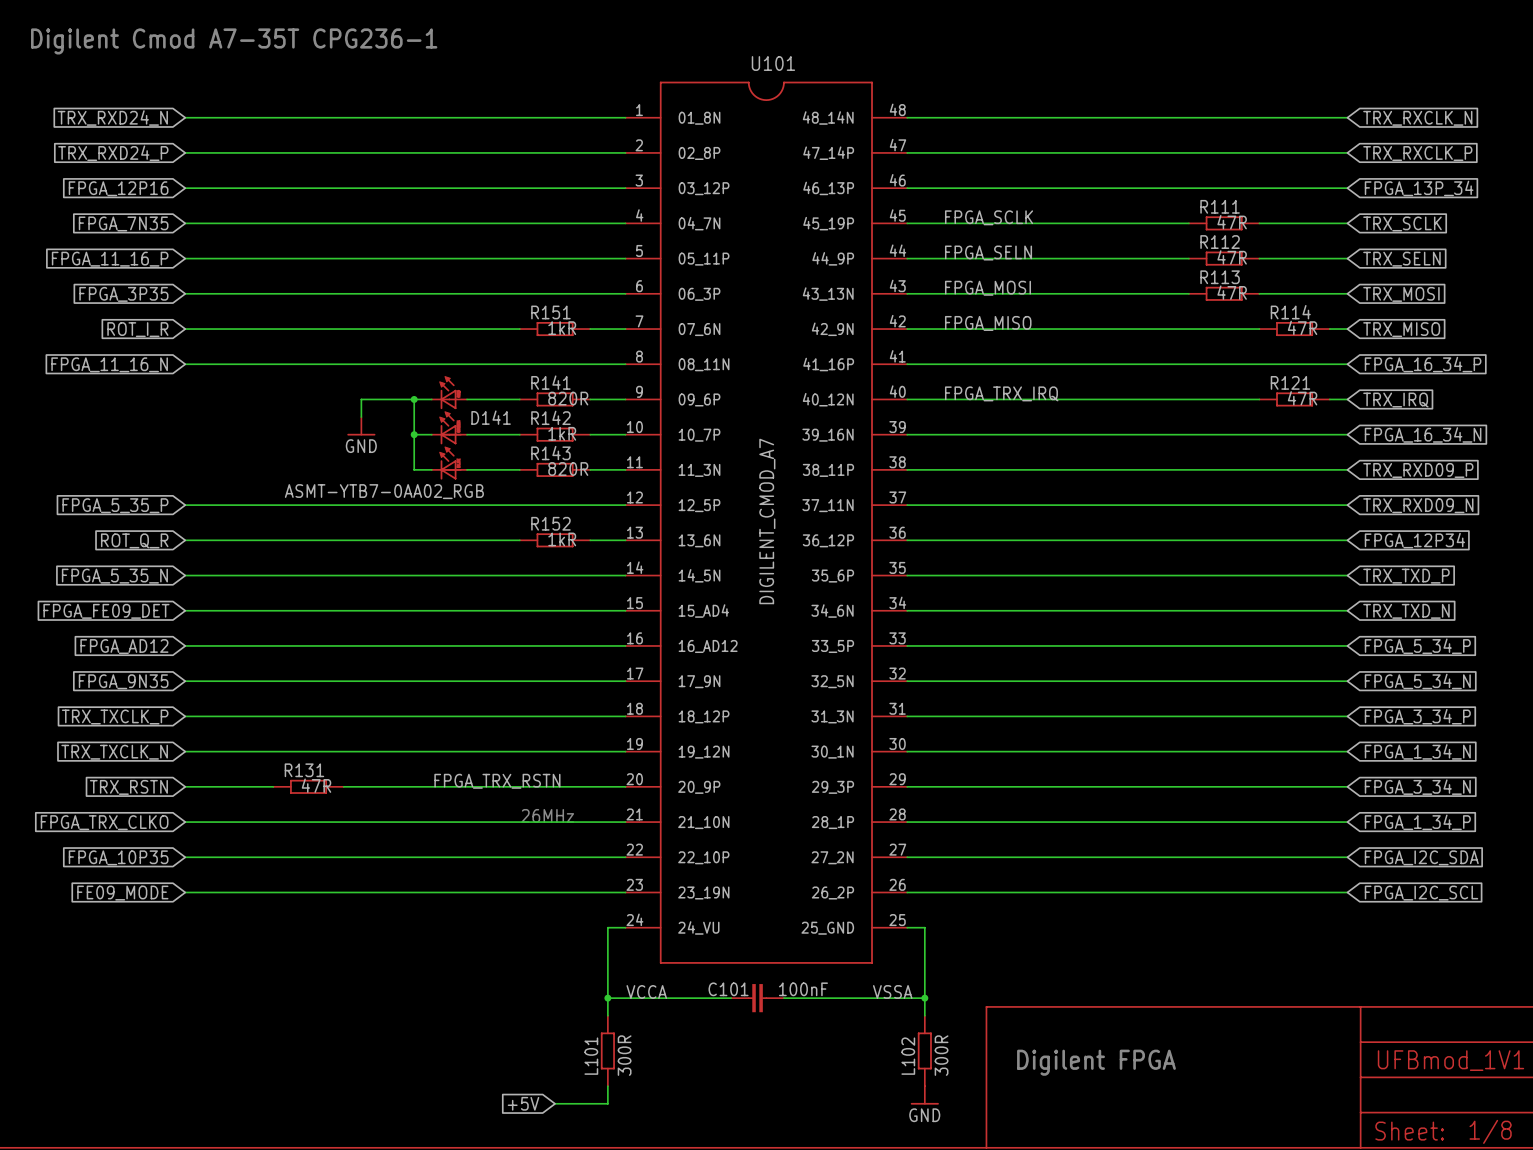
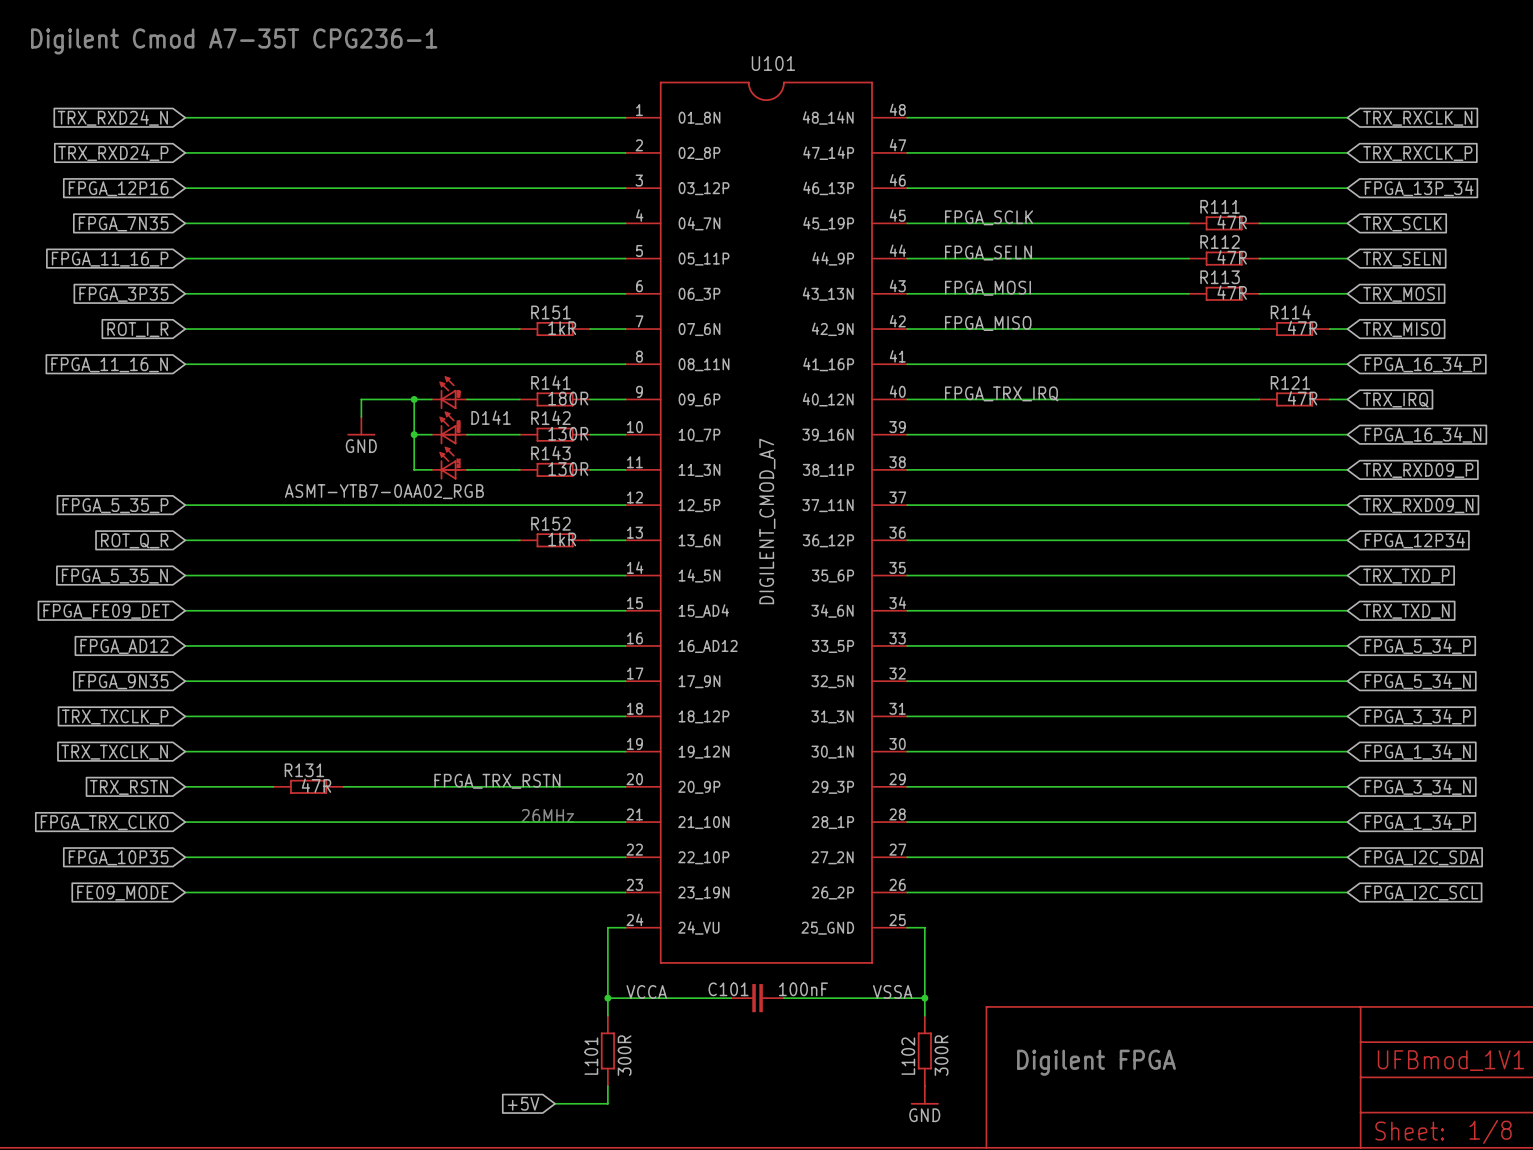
R141 value: 820R (568, 398) -> 180R (568, 398)
R142 value: 1kR (562, 433) -> 130R (568, 433)
R143 value: 820R (568, 469) -> 130R (568, 469)

